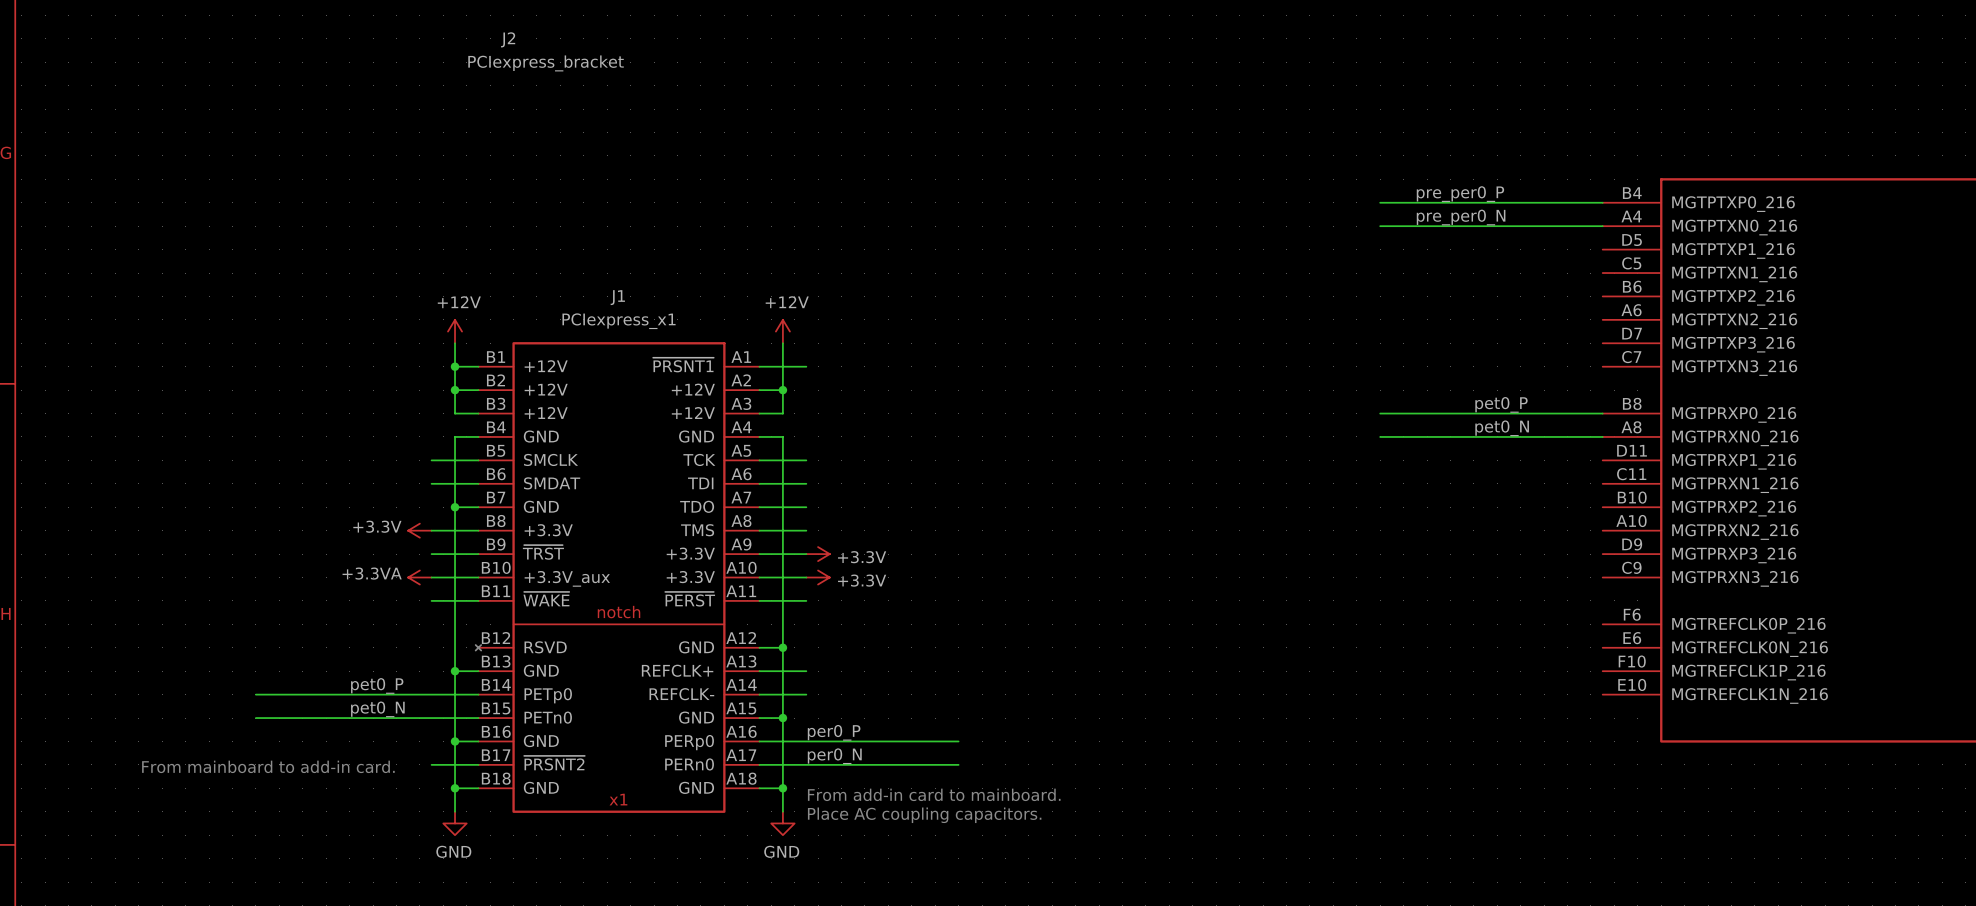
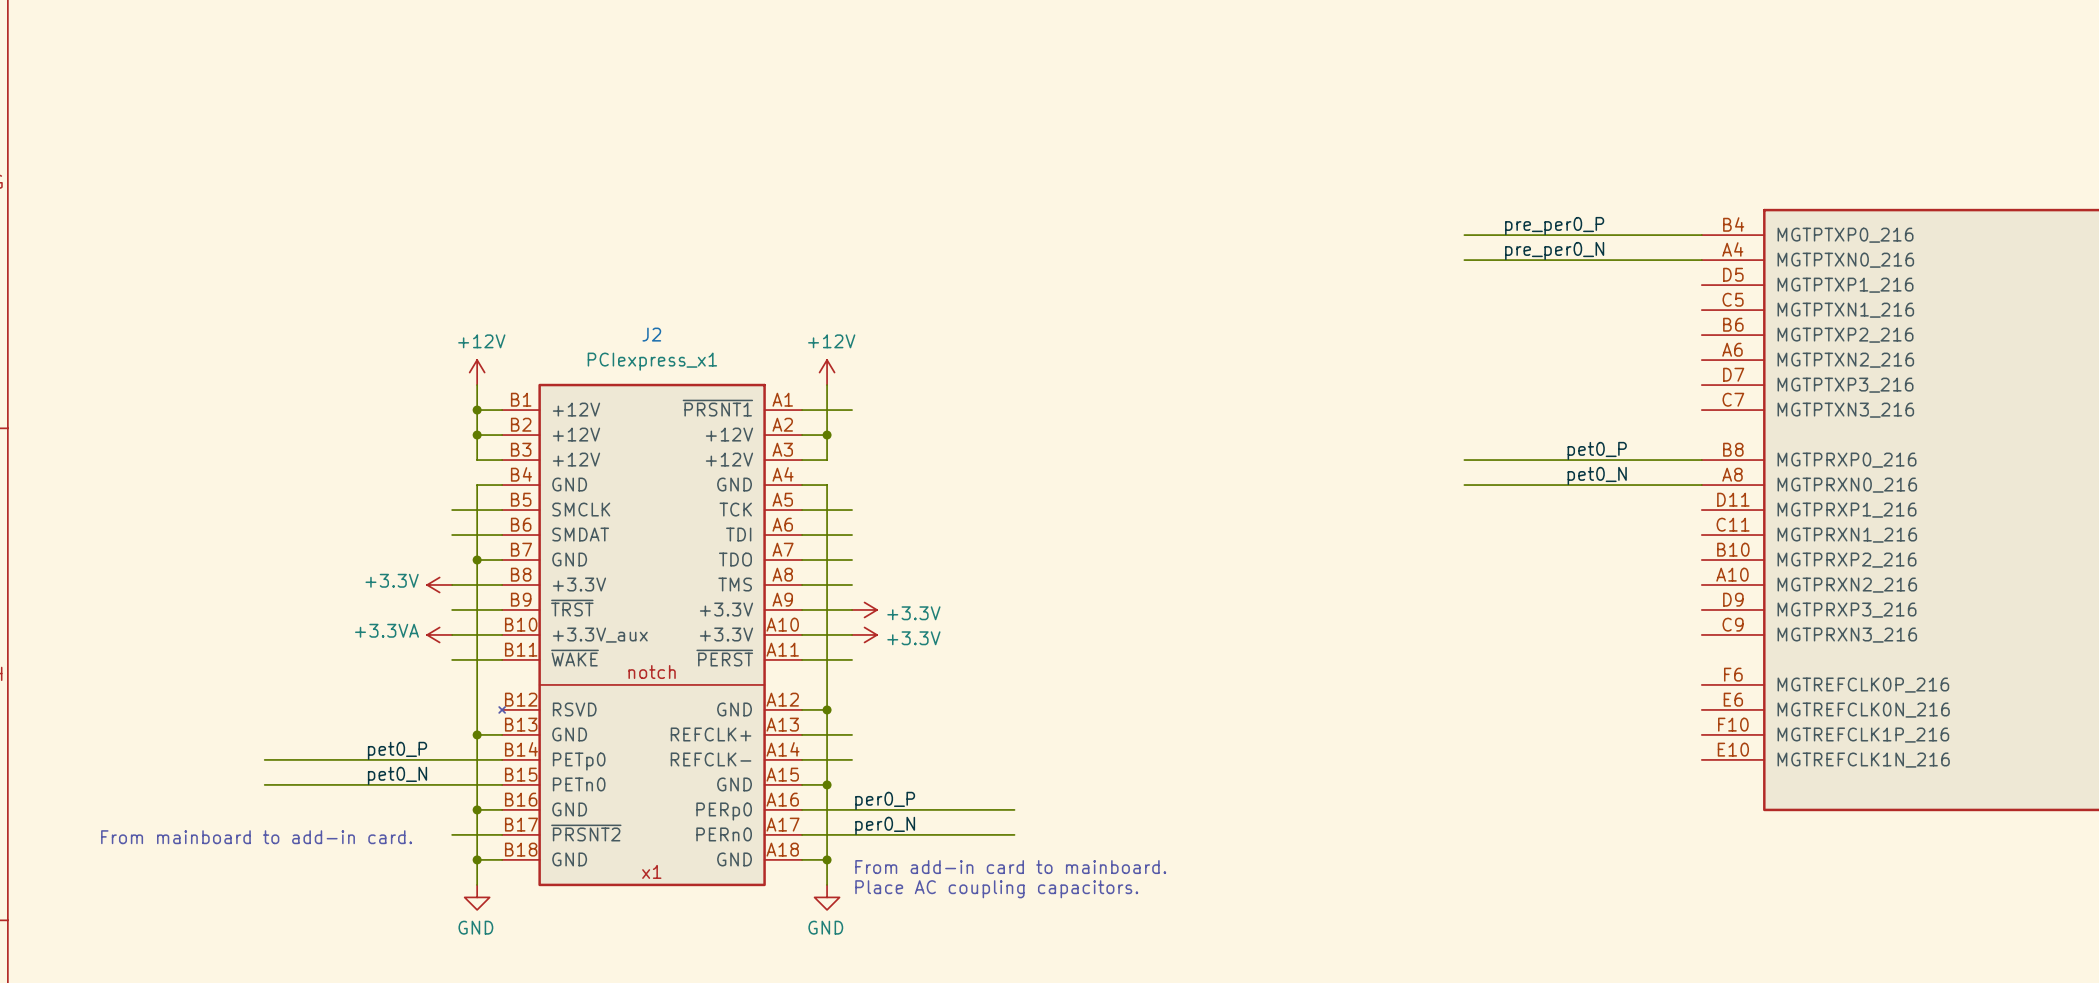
J2: PCIexpress_bracket (546, 51) -> none
J1 name: J1 (617, 297) -> J2 (651, 334)

